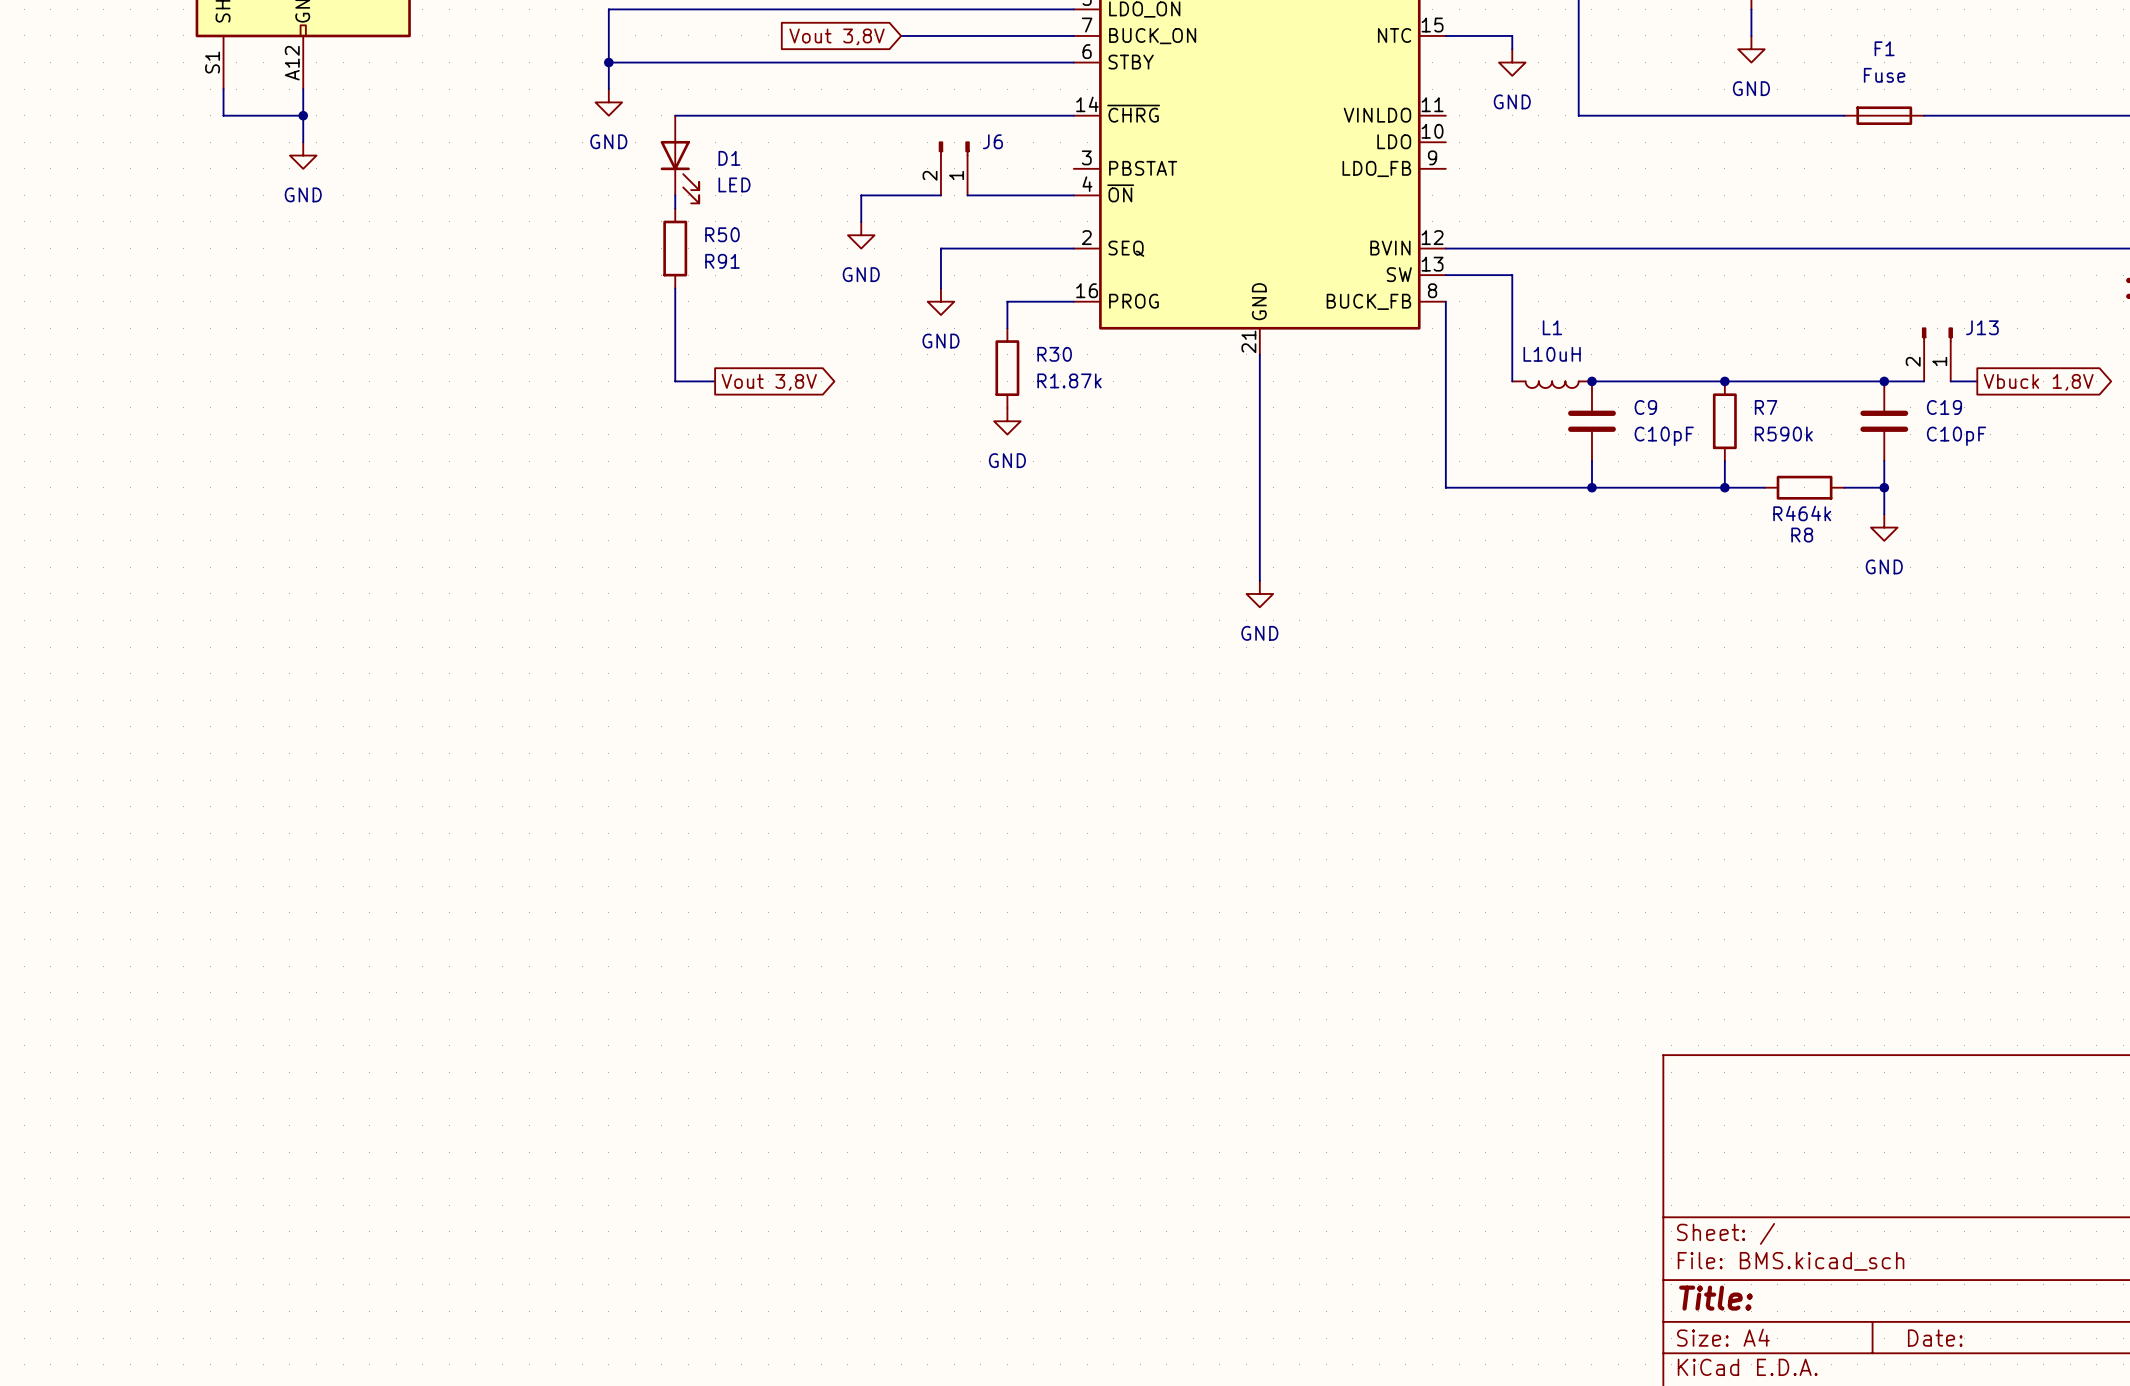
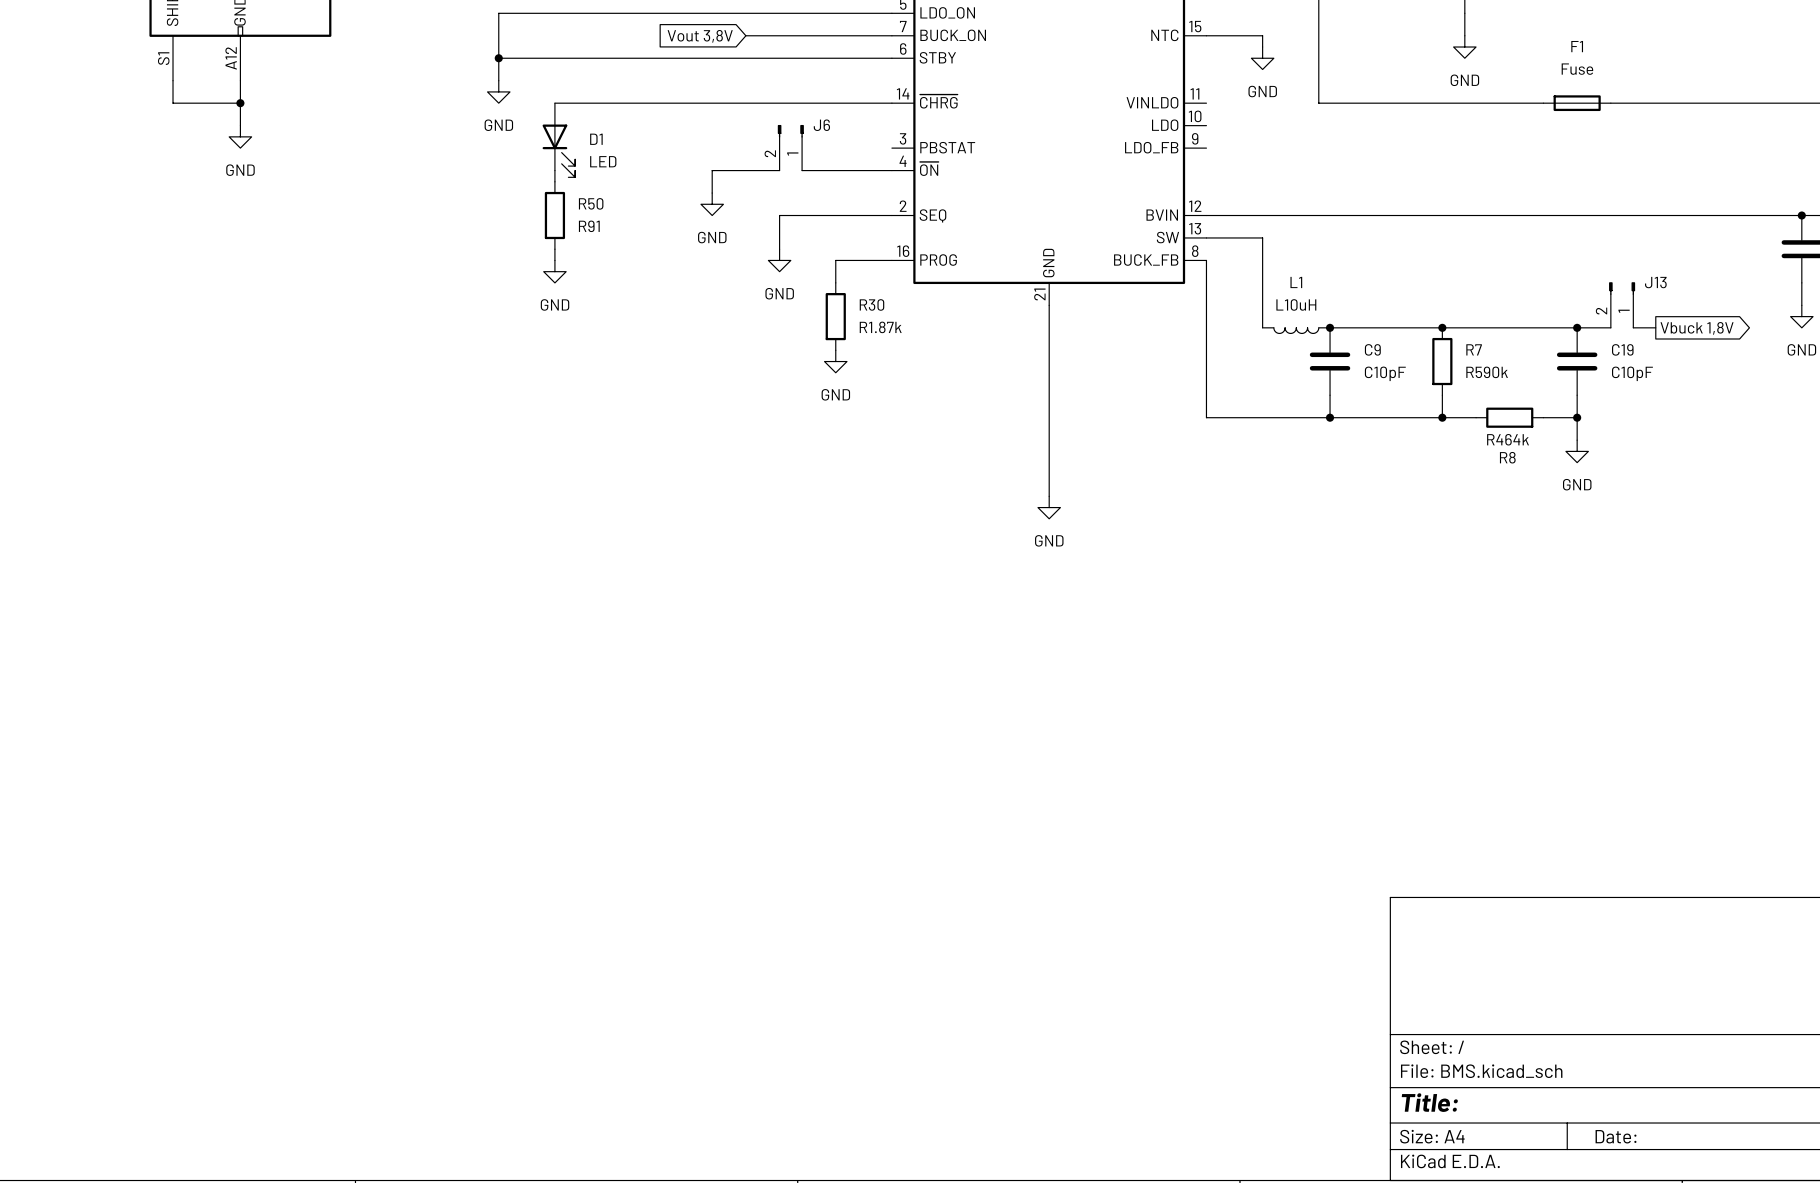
wire: (675, 301) (675, 381) (715, 381) -> none
power symbol: none -> GND (554, 271)
global label: Vout 3,8V (769, 382) -> none

